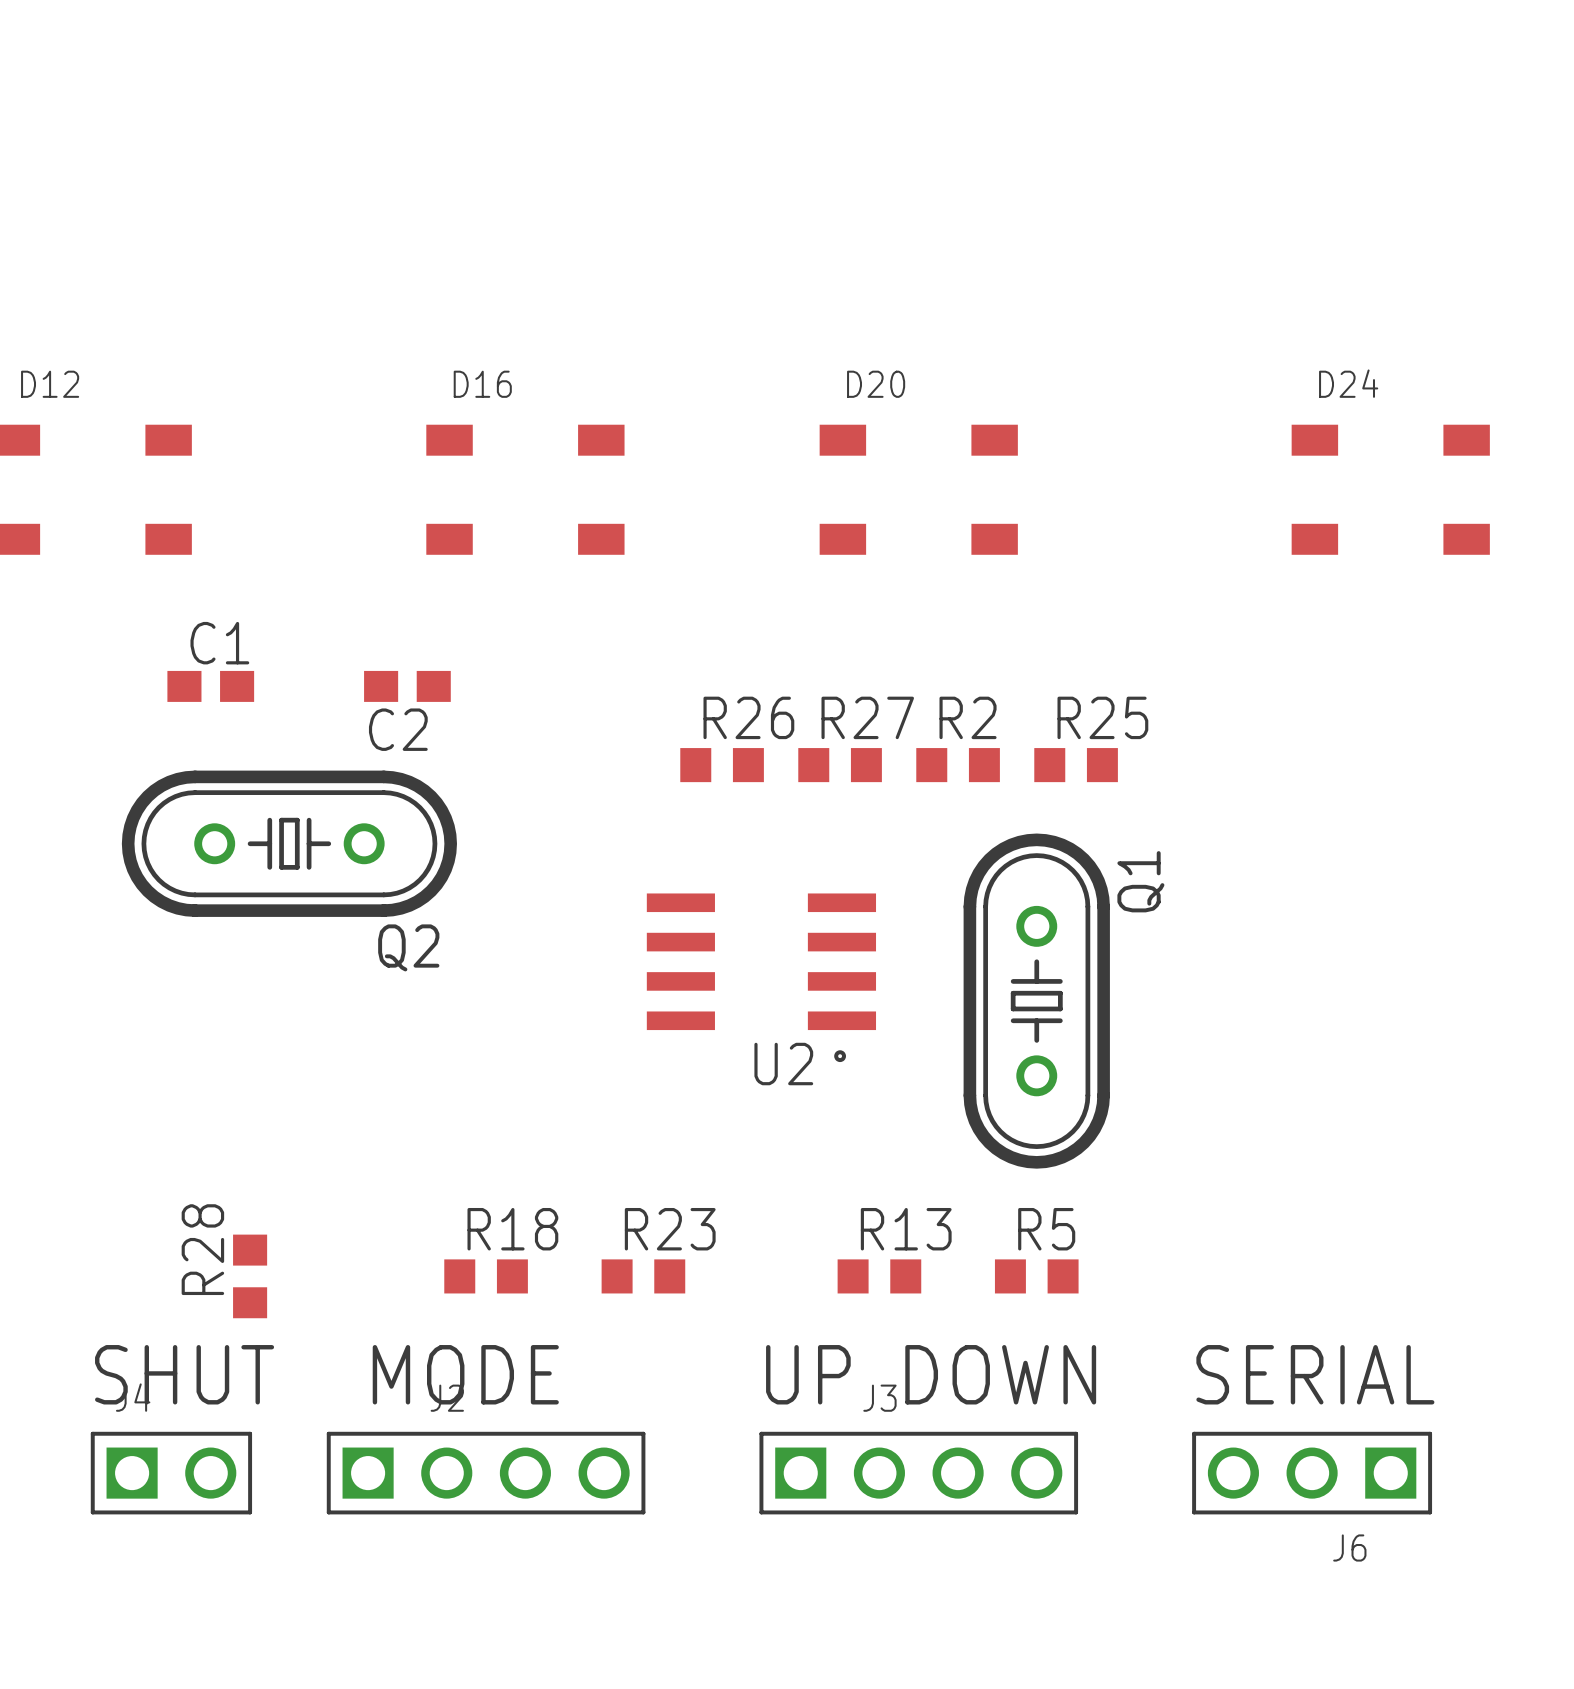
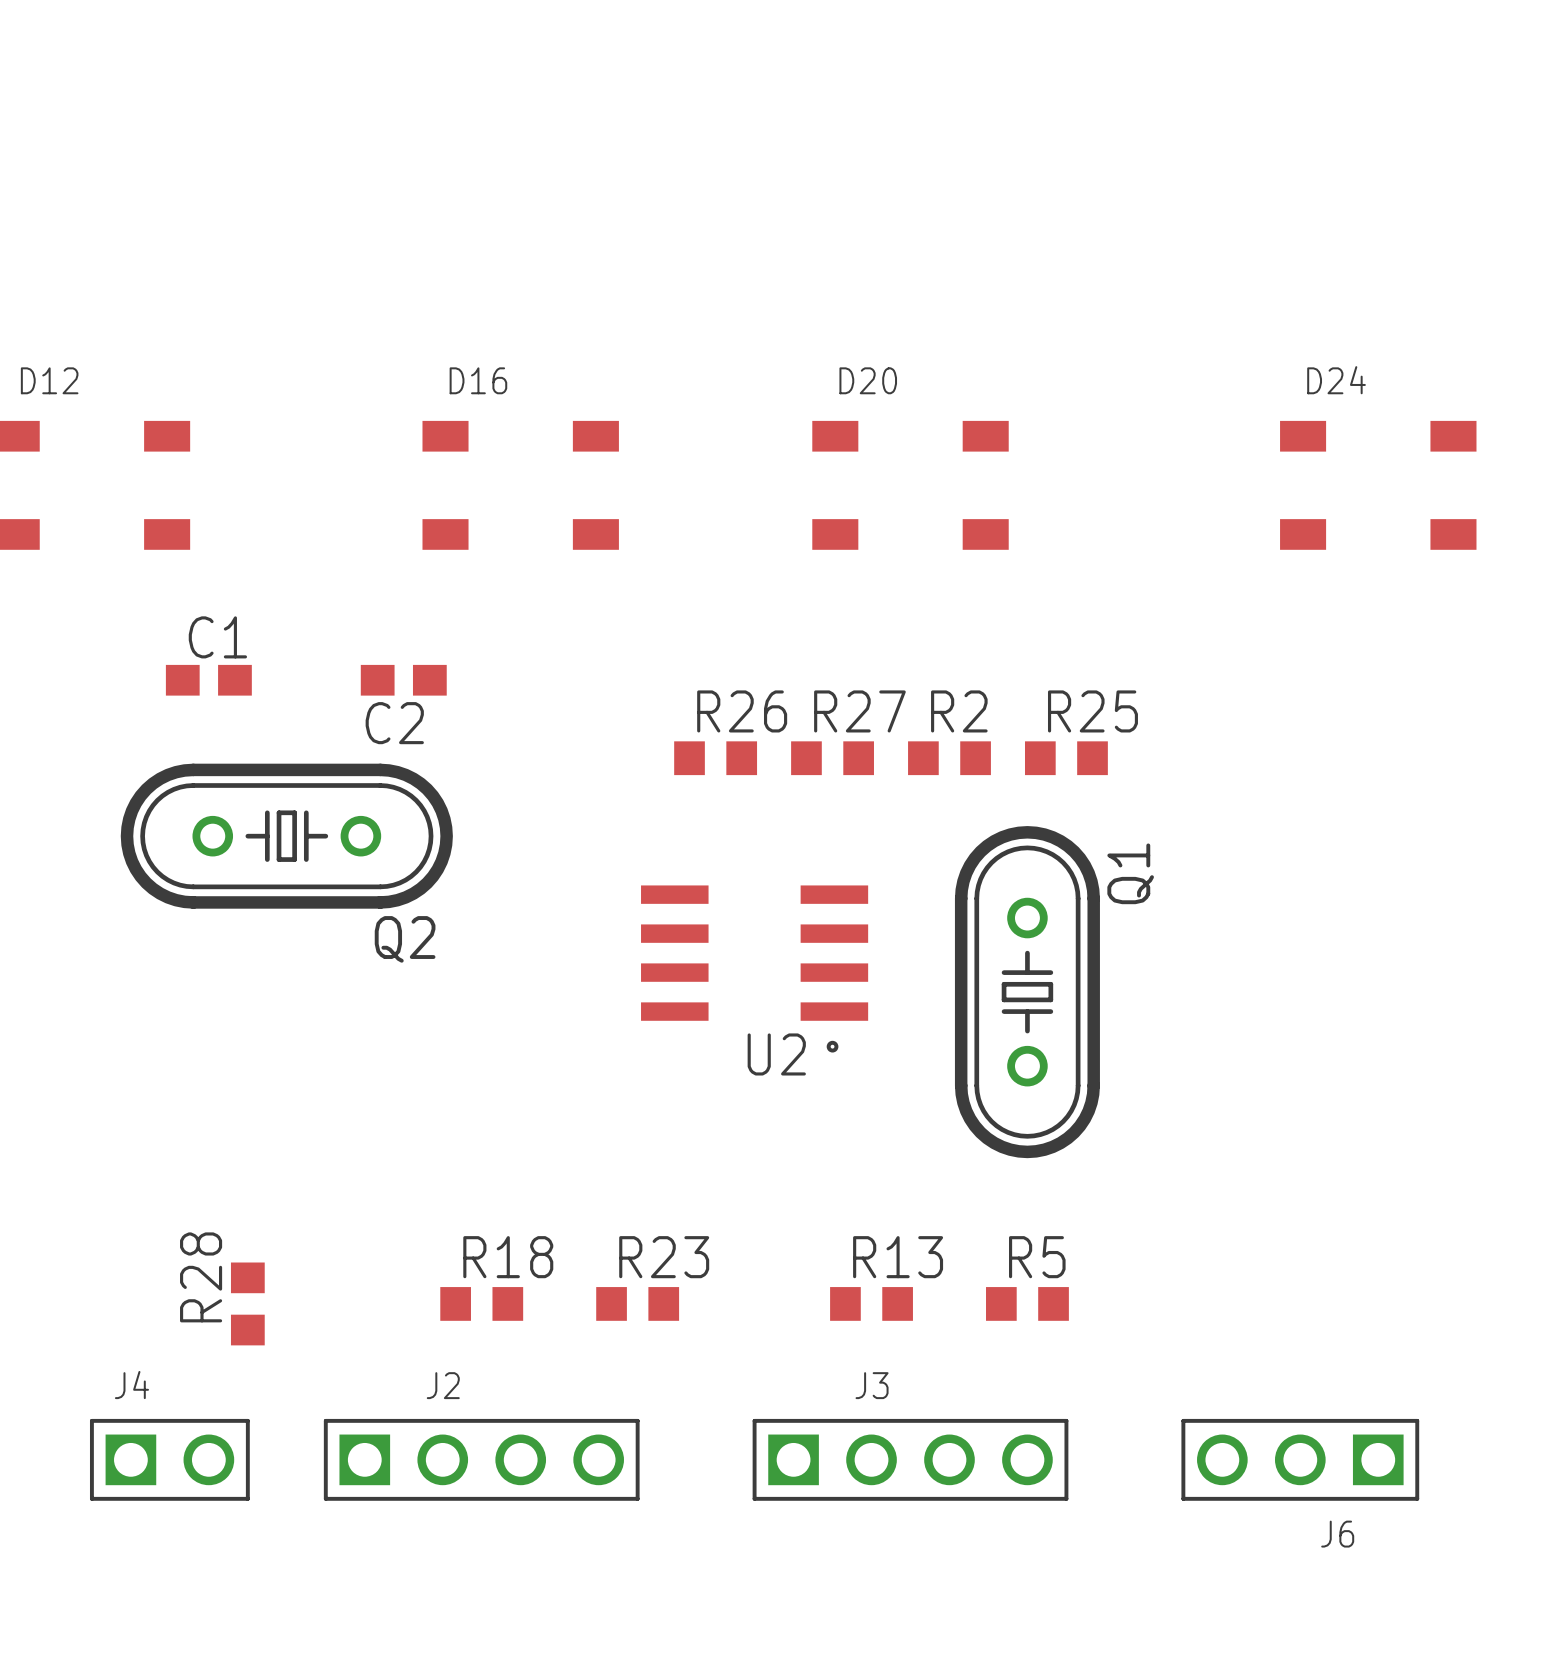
R28 position: (250, 1276) -> (247, 1303)
R18 position: (486, 1276) -> (481, 1303)
R23 position: (643, 1276) -> (637, 1303)
R13 position: (879, 1276) -> (871, 1303)
R5 position: (1036, 1276) -> (1027, 1303)
text: SHUT (184, 1374) -> none
text: MODE (465, 1374) -> none
text: UP DOWN (931, 1374) -> none
text: SERIAL (1315, 1374) -> none

